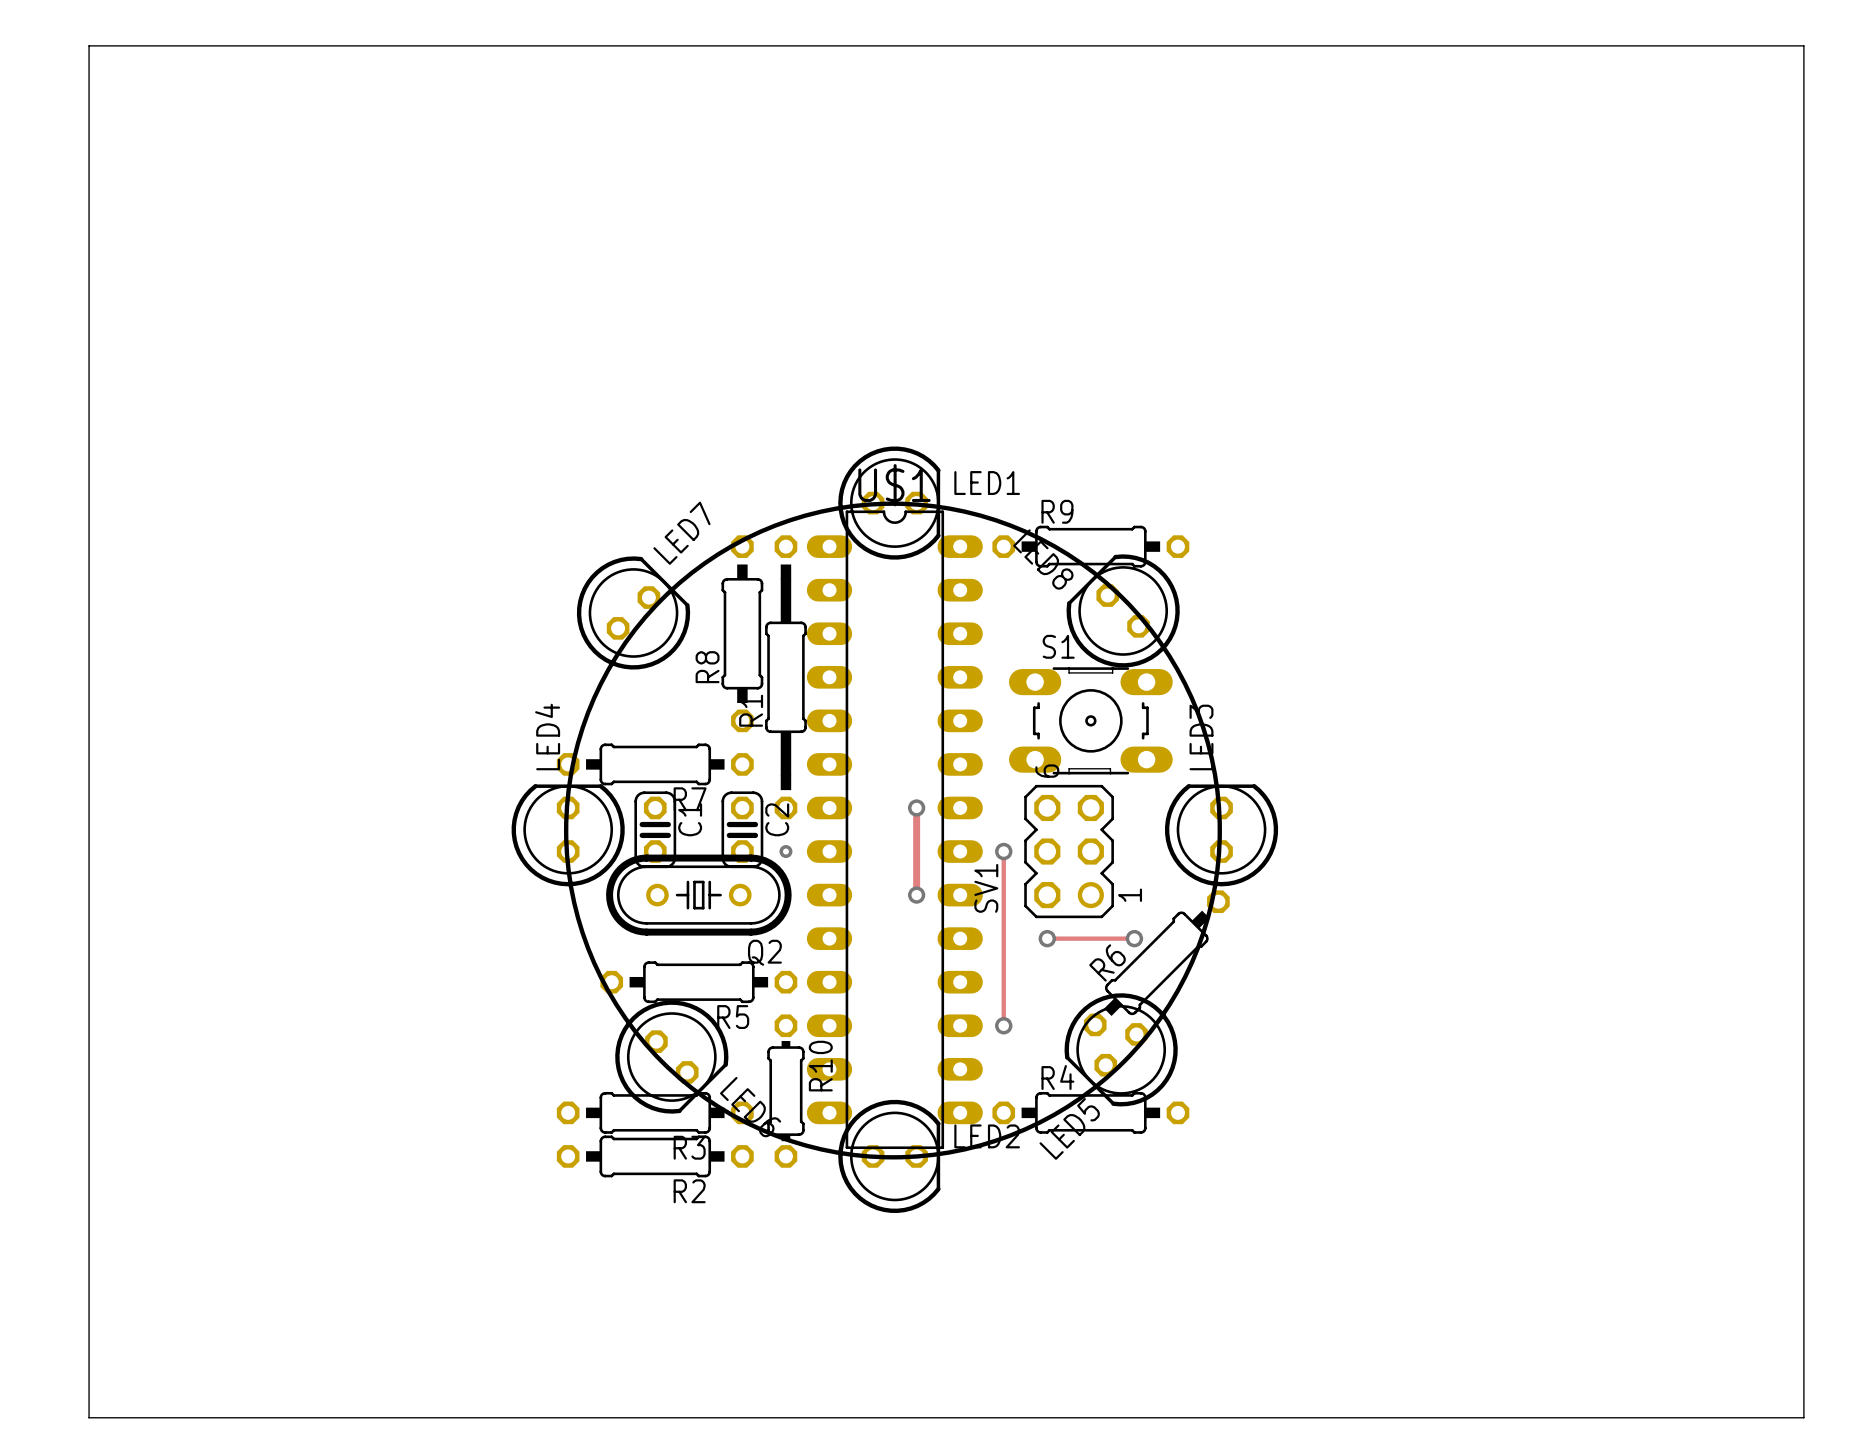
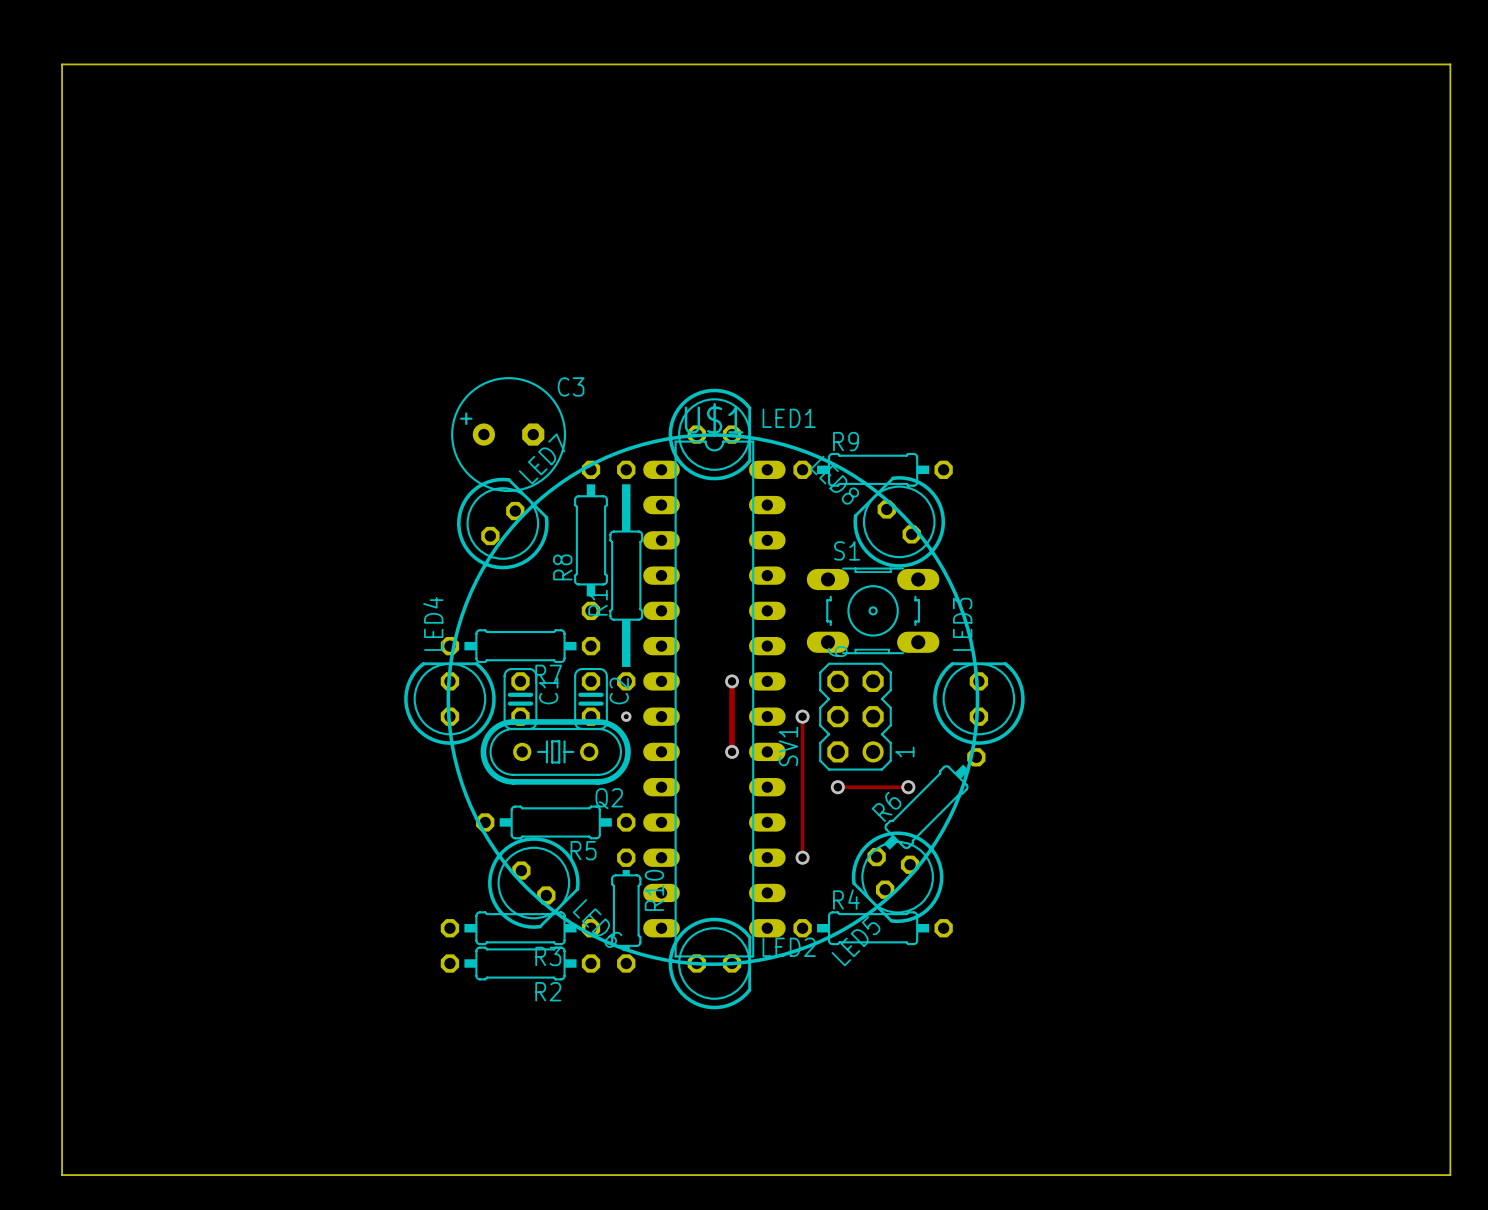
C3: none -> (508, 434)

